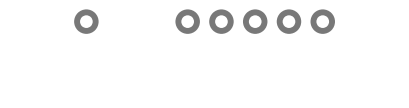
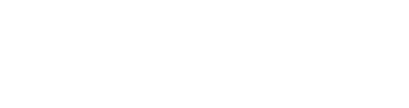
via: (86, 21) -> none
via: (187, 21) -> none
via: (221, 21) -> none
via: (255, 21) -> none
via: (288, 21) -> none
via: (322, 21) -> none

